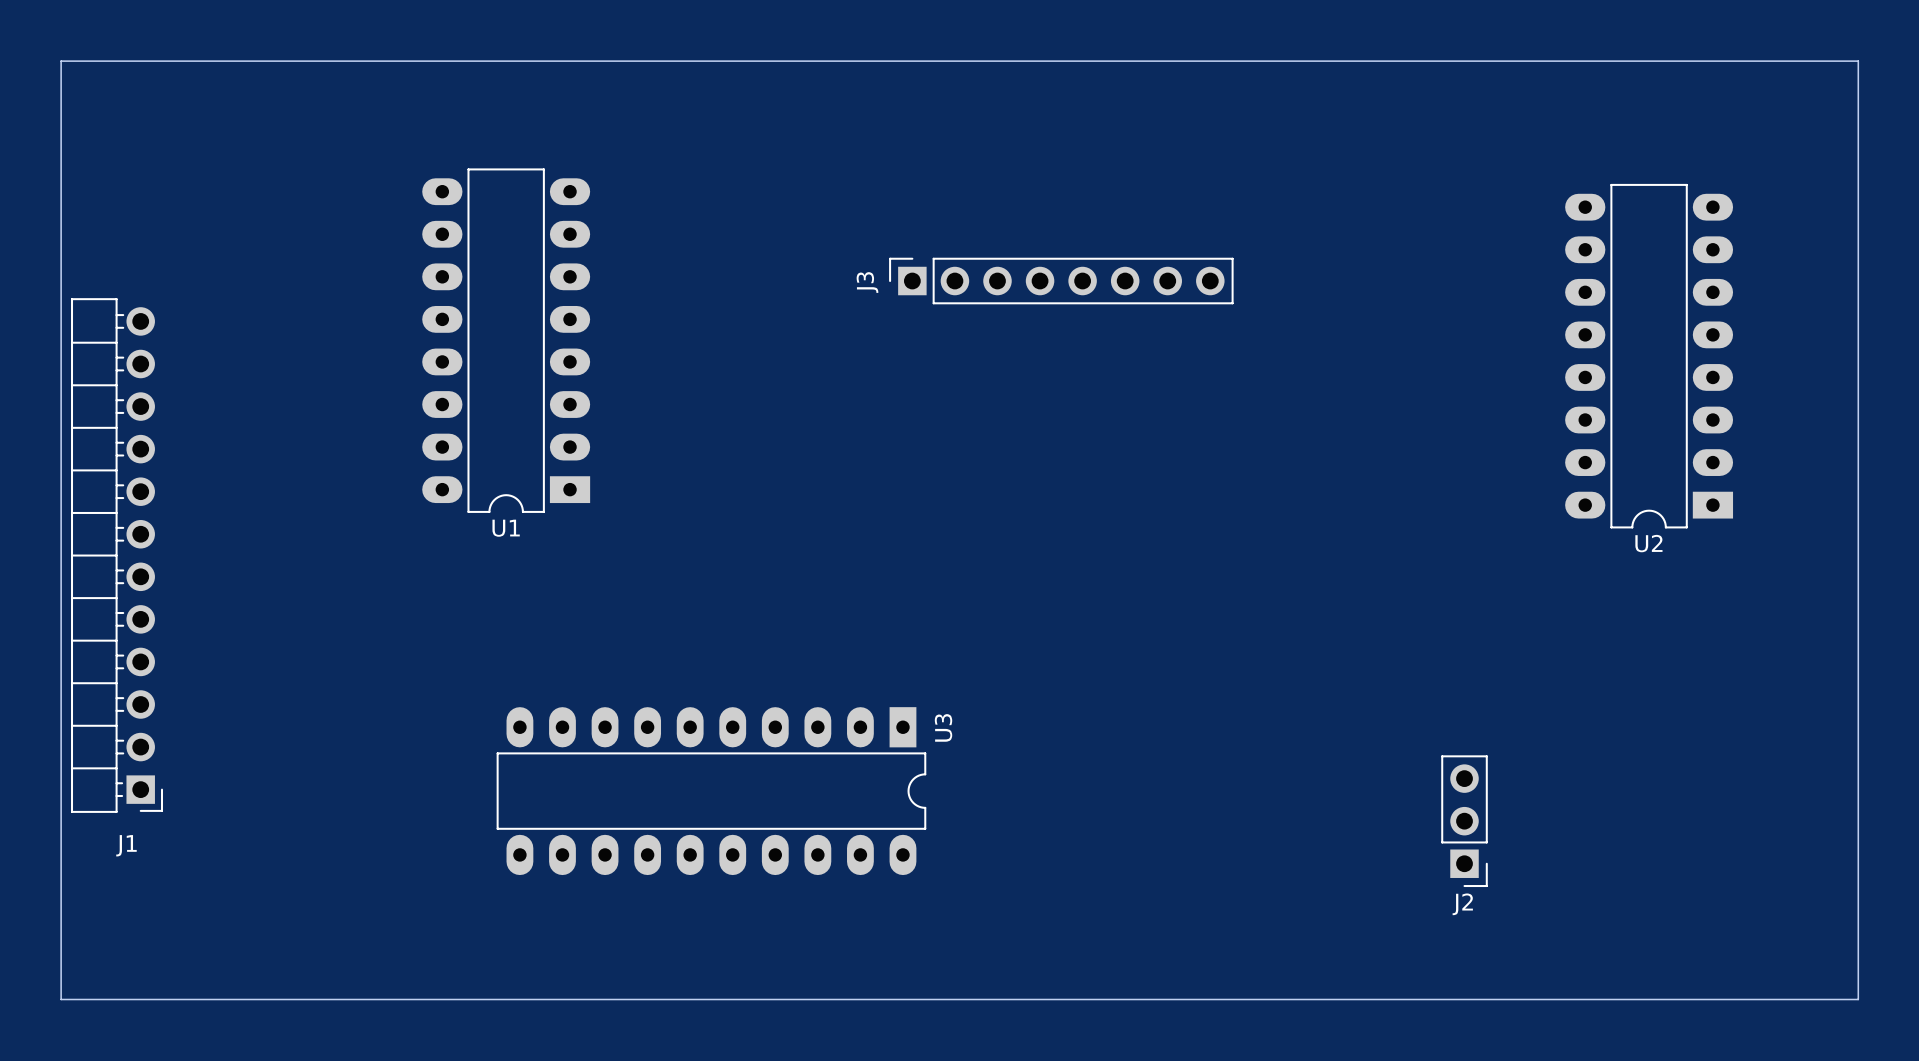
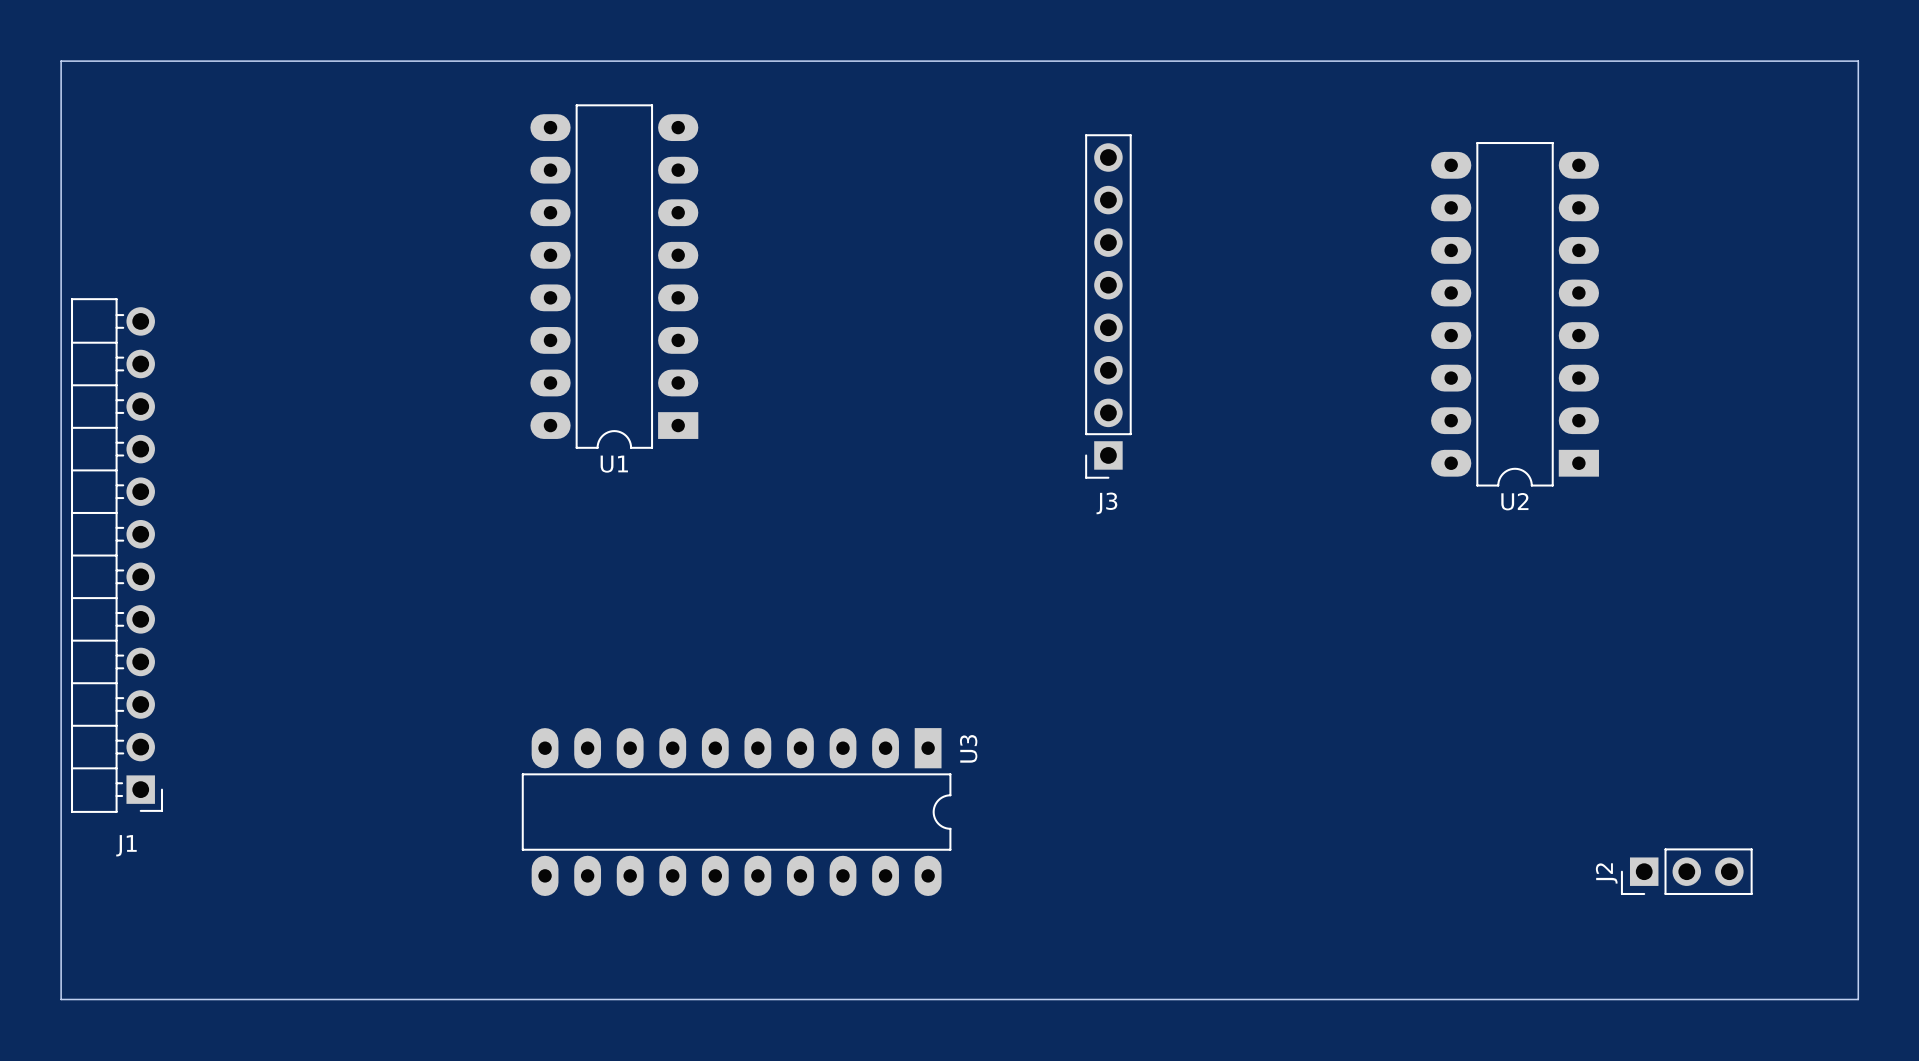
J3 rotation: 0° (1061, 281) -> 90° counterclockwise (1108, 306)
U1 position: (506, 340) -> (614, 276)
U2 position: (1649, 356) -> (1515, 314)
U3 position: (711, 791) -> (736, 812)
J2 rotation: 0° (1464, 821) -> 90° clockwise (1686, 871)
J2 position: (1464, 821) -> (1686, 871)

